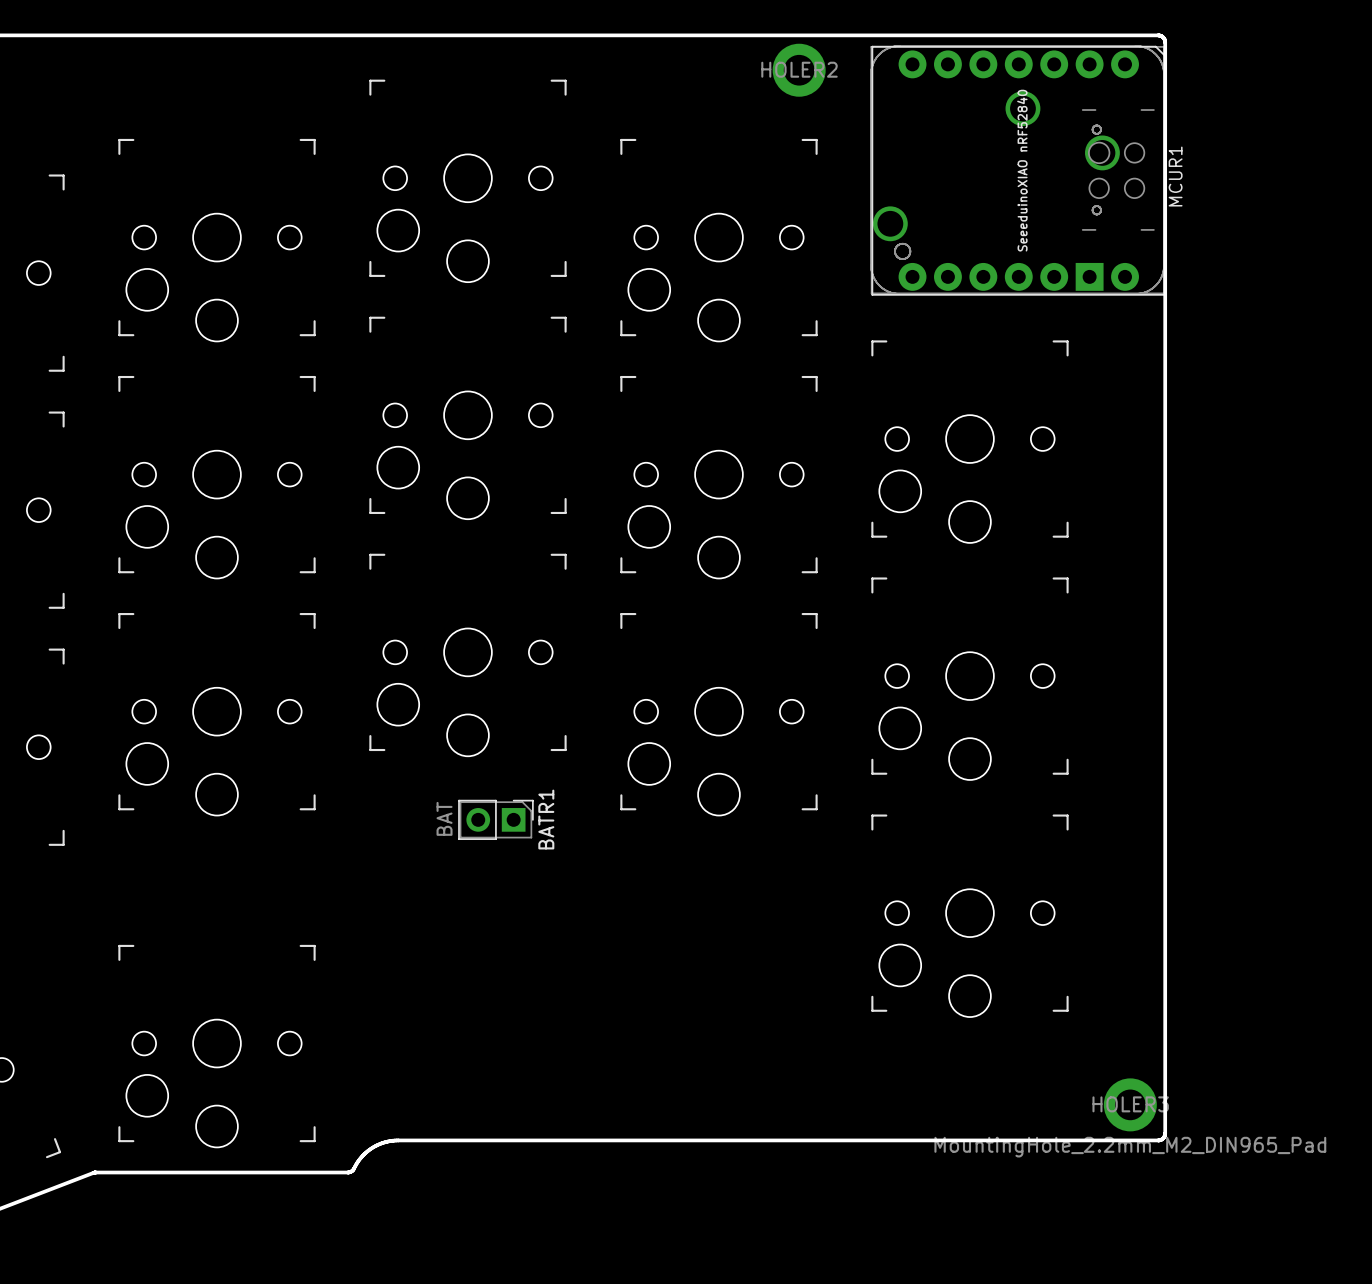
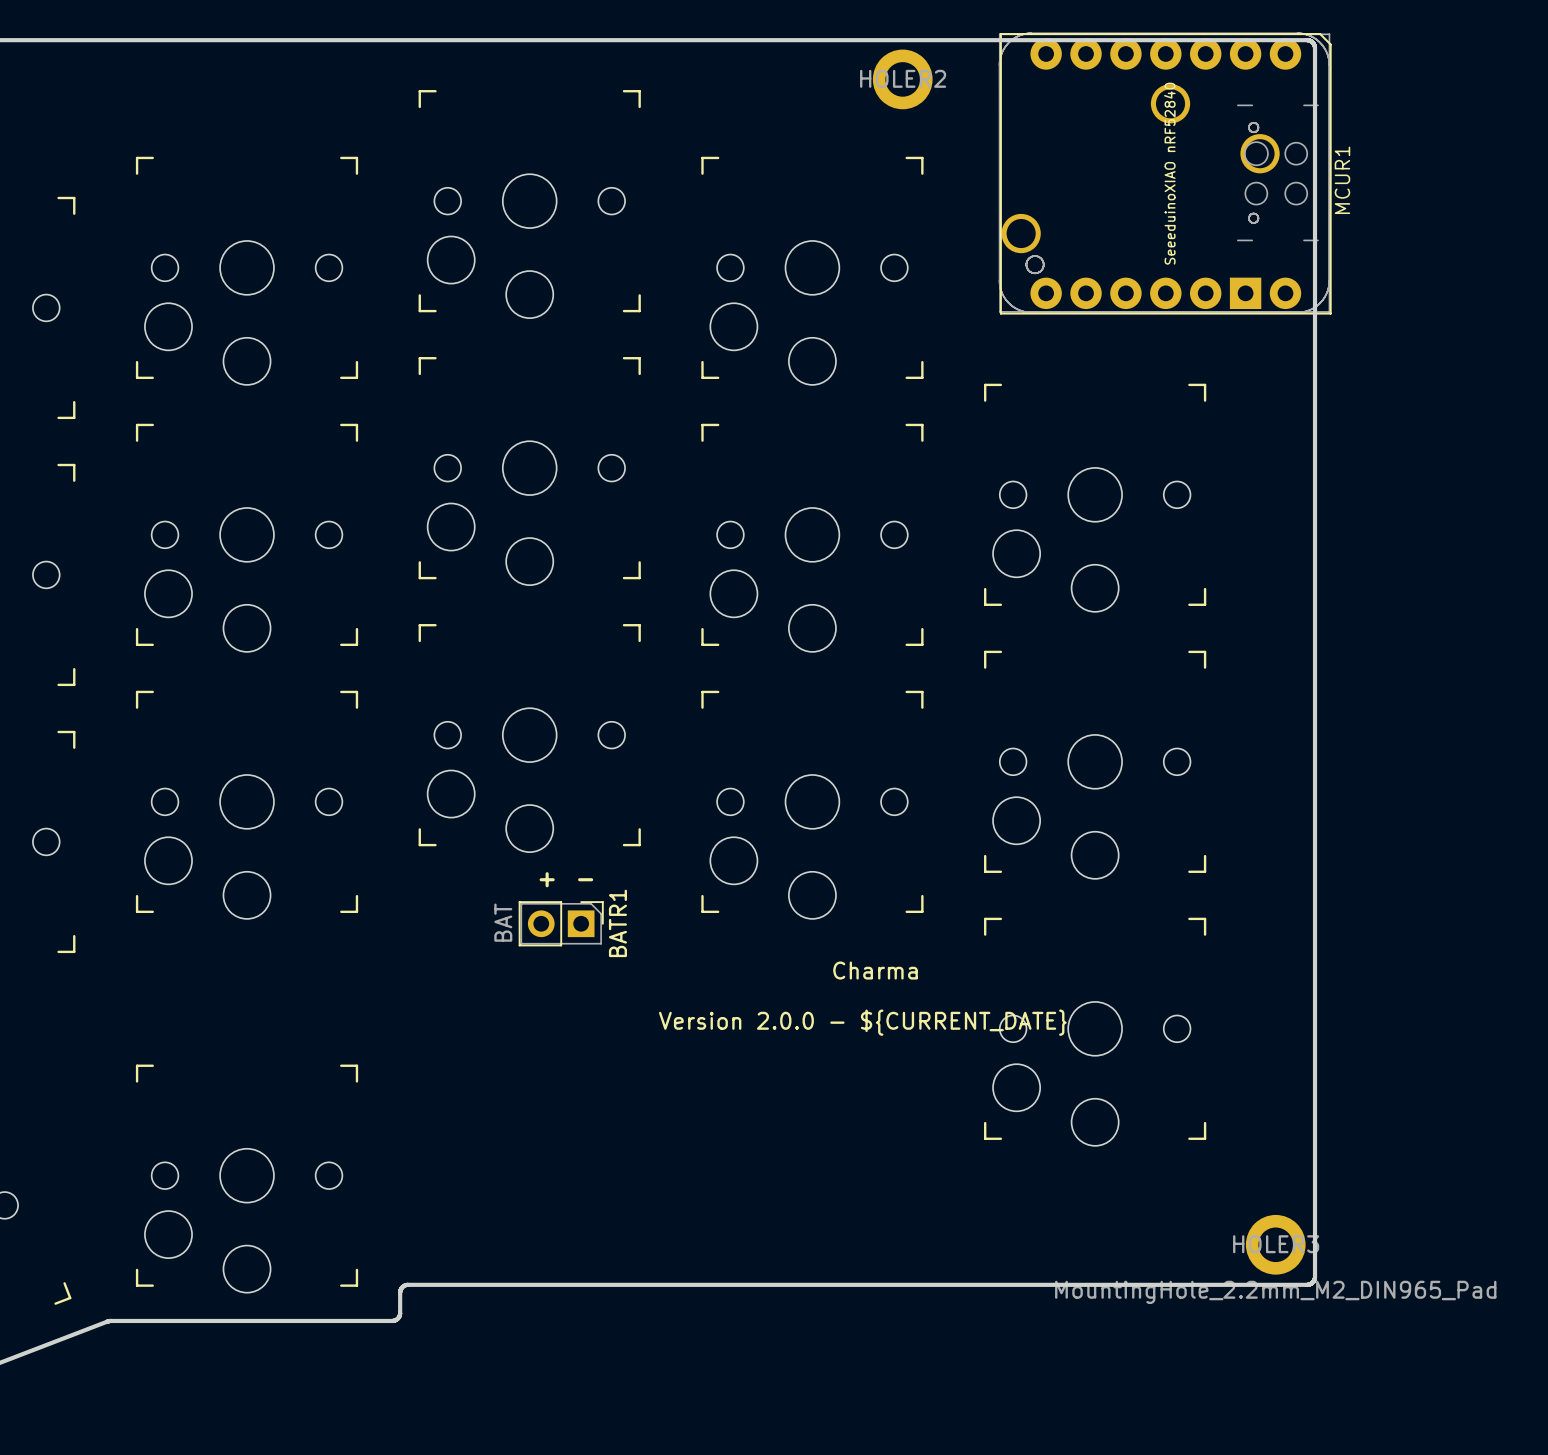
MCUR1 position: (1018, 170) -> (1165, 173)
text: none -> + (547, 879)
text: none -> - (585, 879)
text: none -> Charma (875, 970)
text: none -> Version 2.0.0 - ${CURRENT_DATE} (862, 1022)
board edge: (398, 1140) (384, 1142) (372, 1148) (361, 1156) (352, 1170) (345, 1172) -> (451, 1284) (403, 1285) (400, 1291) (399, 1315) (392, 1320)

